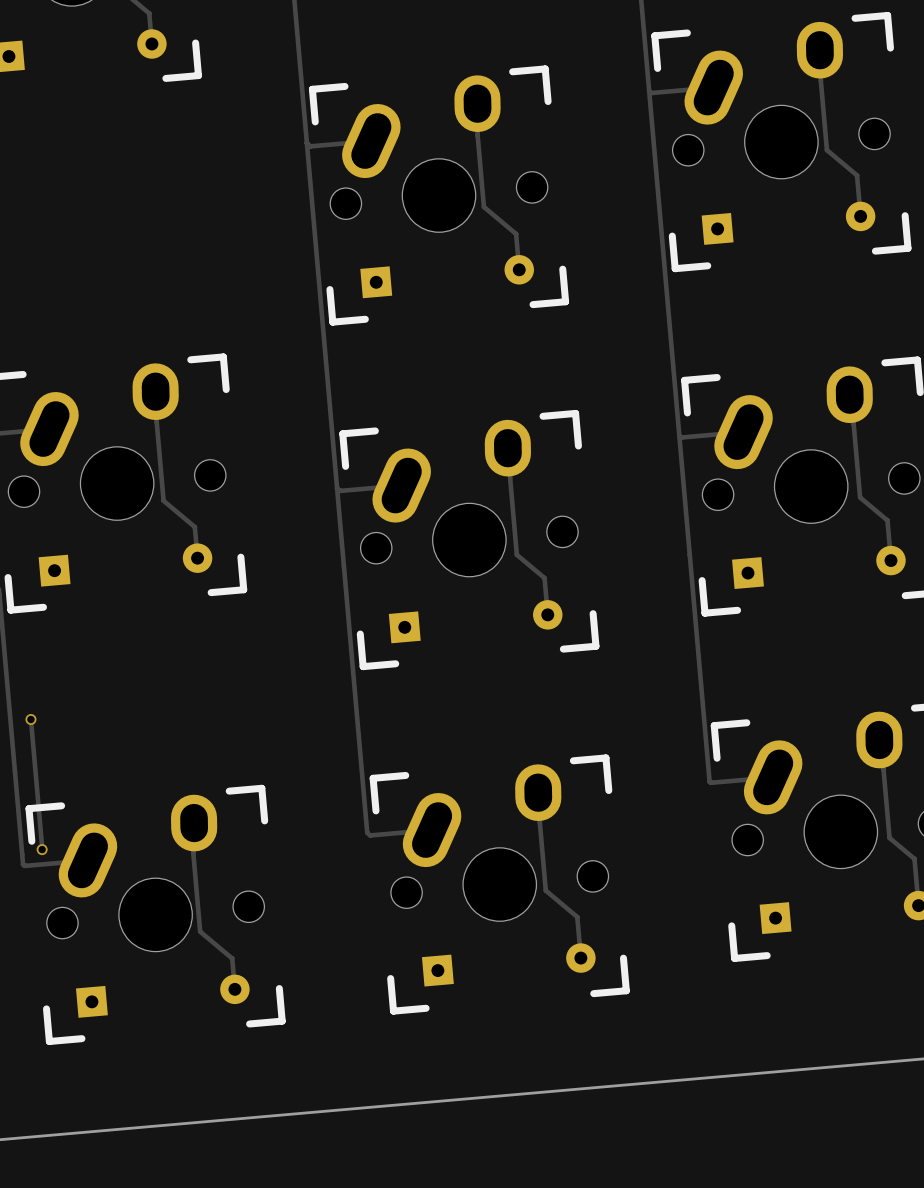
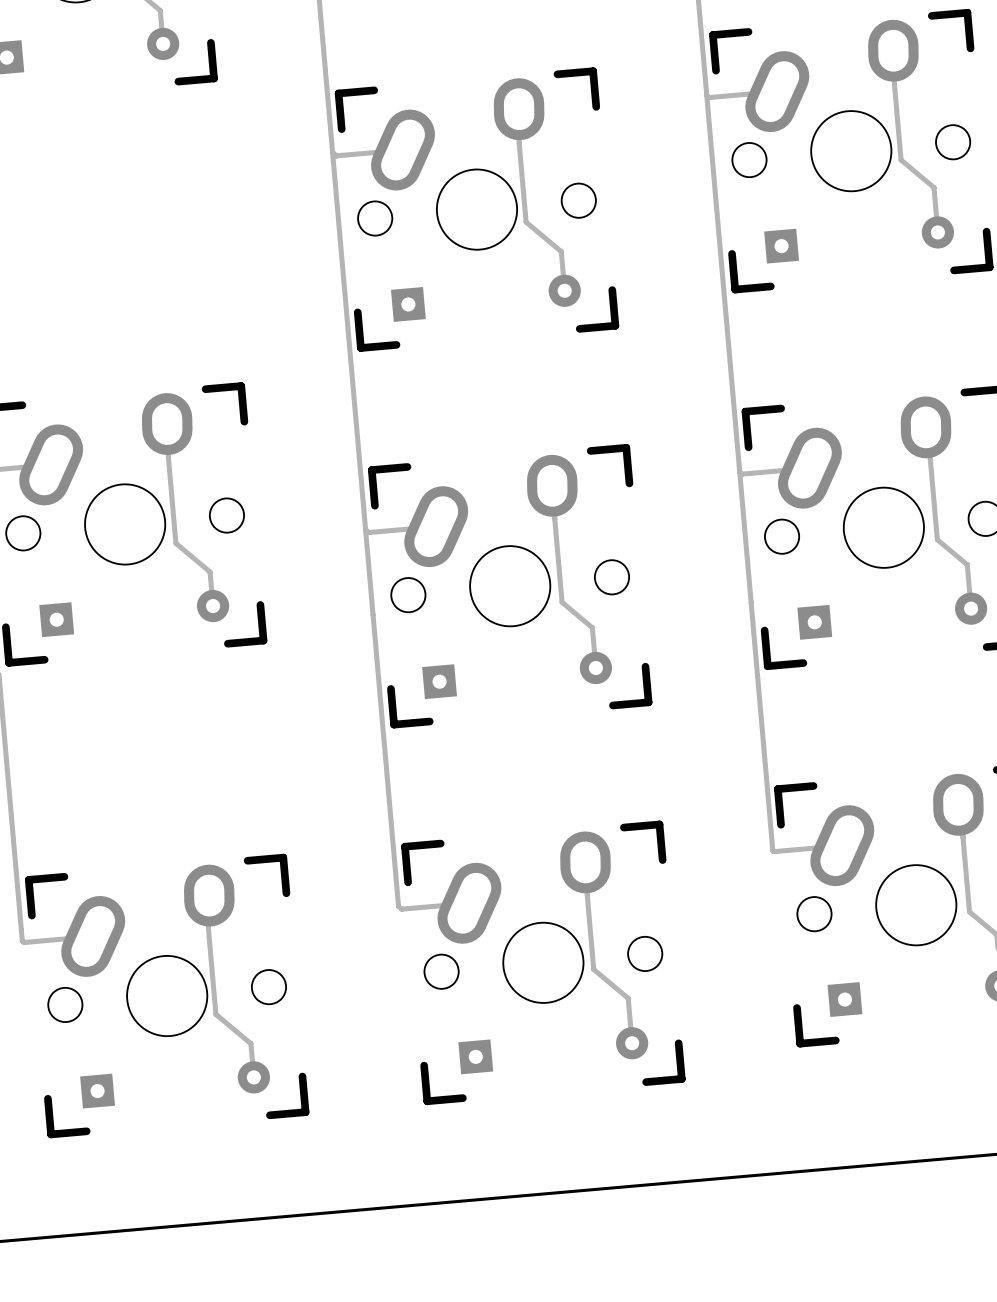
track: (30, 719) (42, 849) -> none
via: (30, 719) -> none
via: (42, 849) -> none

